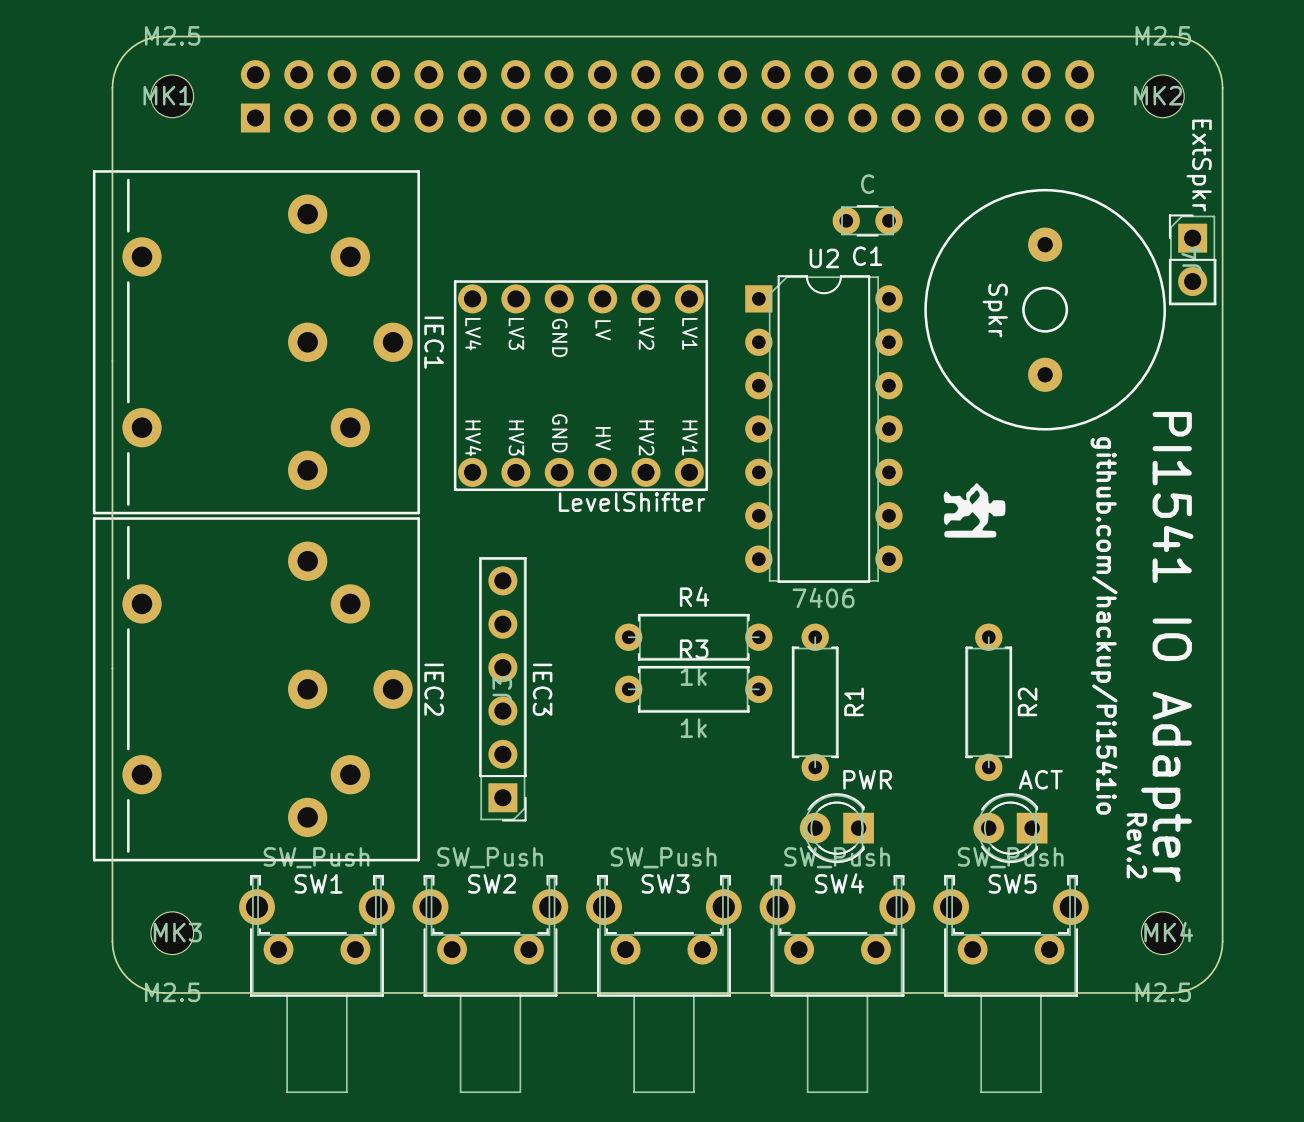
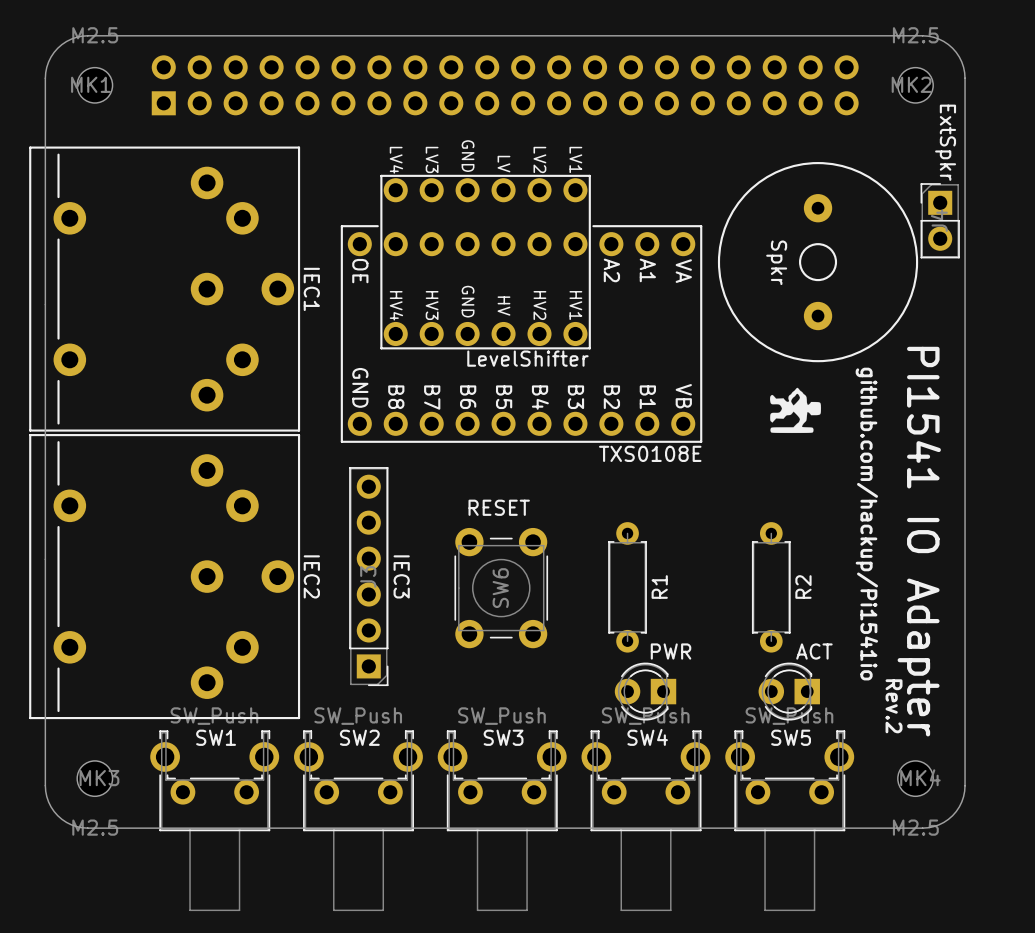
C1: C (867, 220) -> none
part: none -> LevelShifter (485, 262)
part: LevelShifter (580, 385) -> none
part: none -> TXS0108E (521, 333)
U2: 7406 (823, 429) -> none
drawing position: (974, 510) -> (795, 410)
R4: 1k (693, 637) -> none
R3: 1k (693, 689) -> none
SW6: none -> RESET (501, 588)

